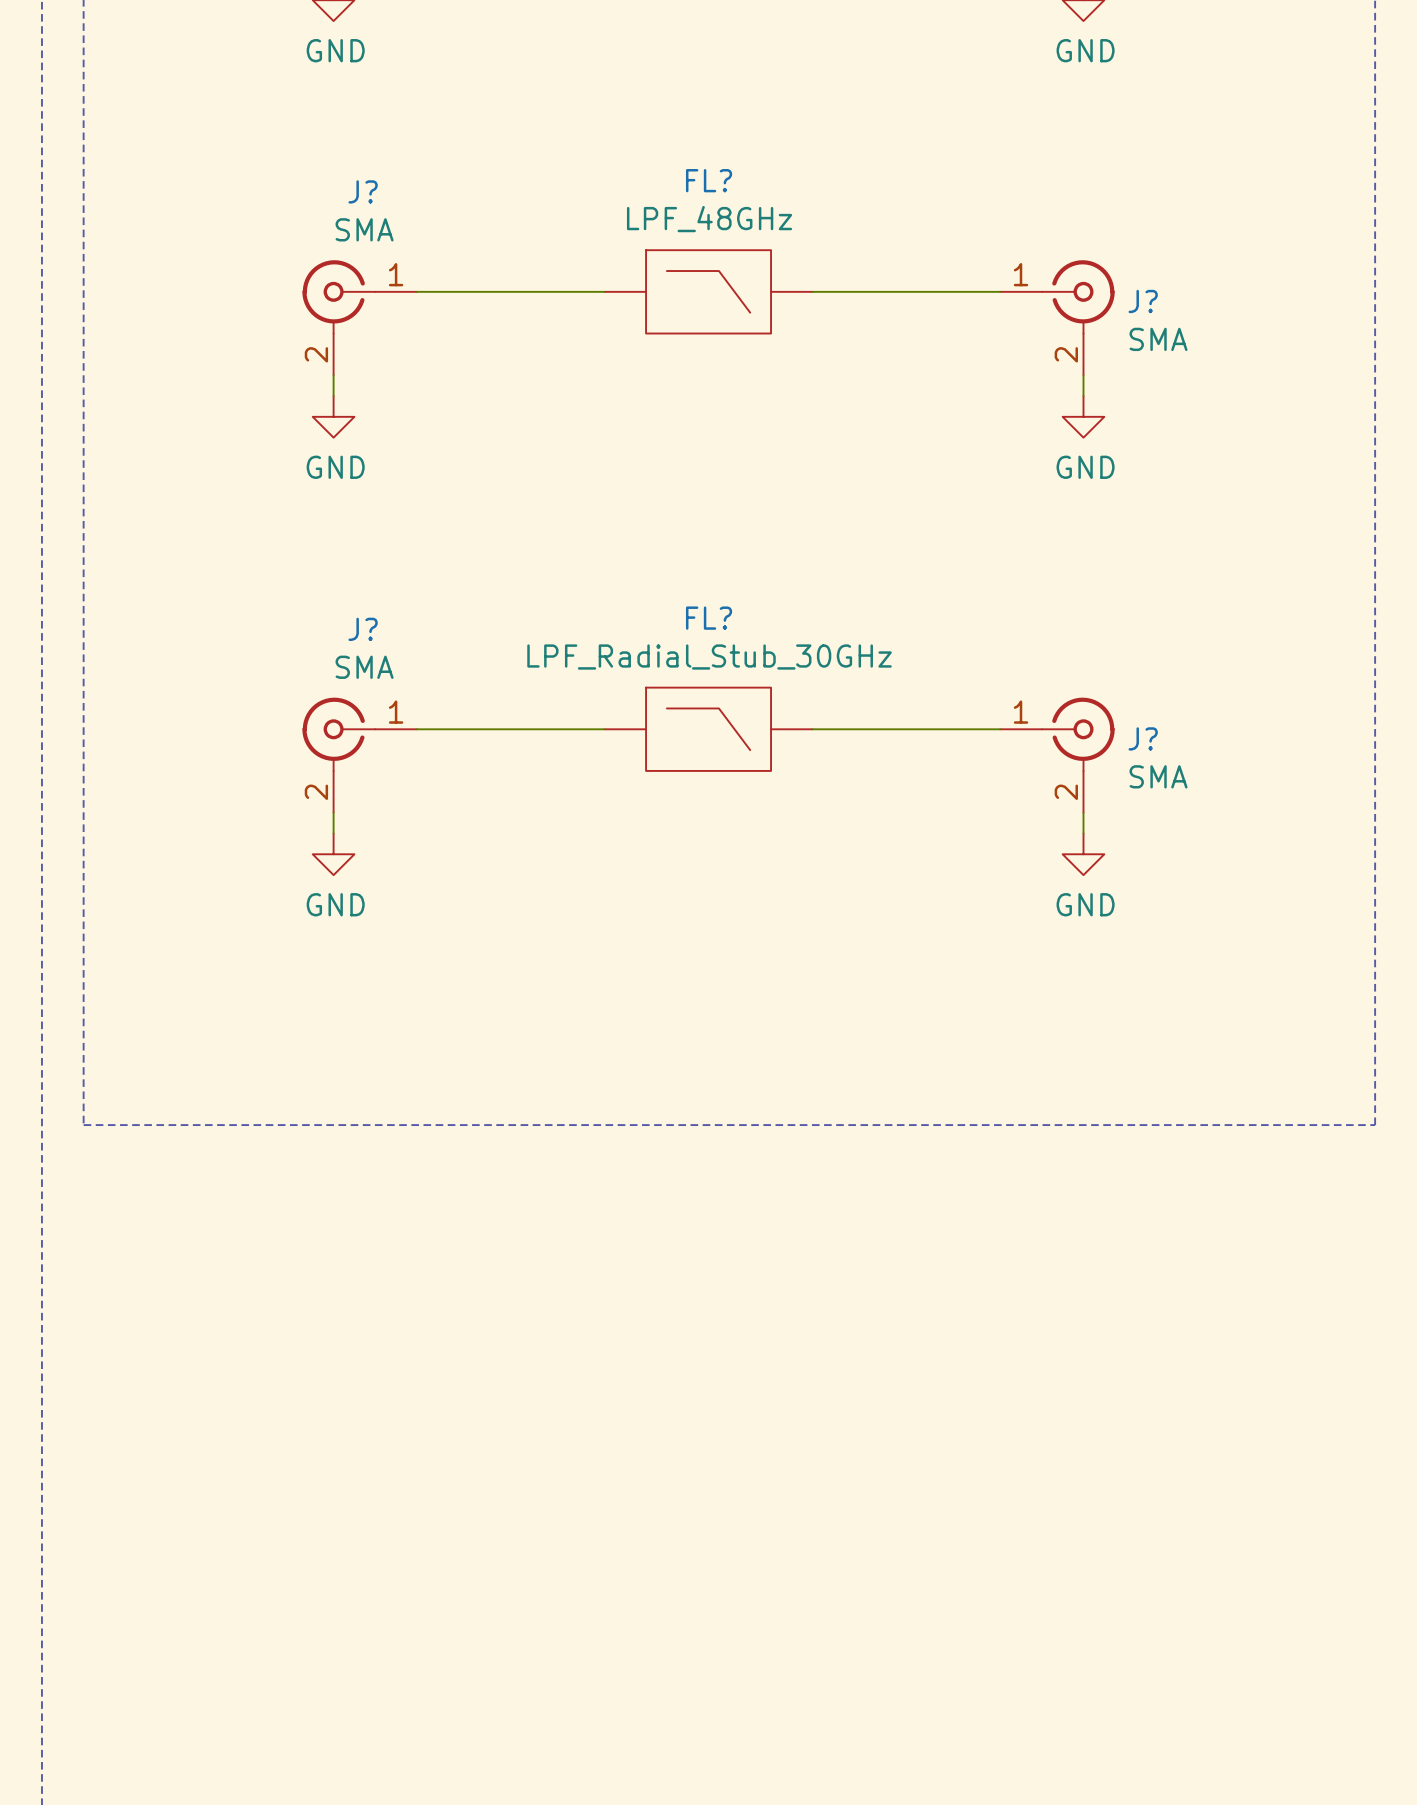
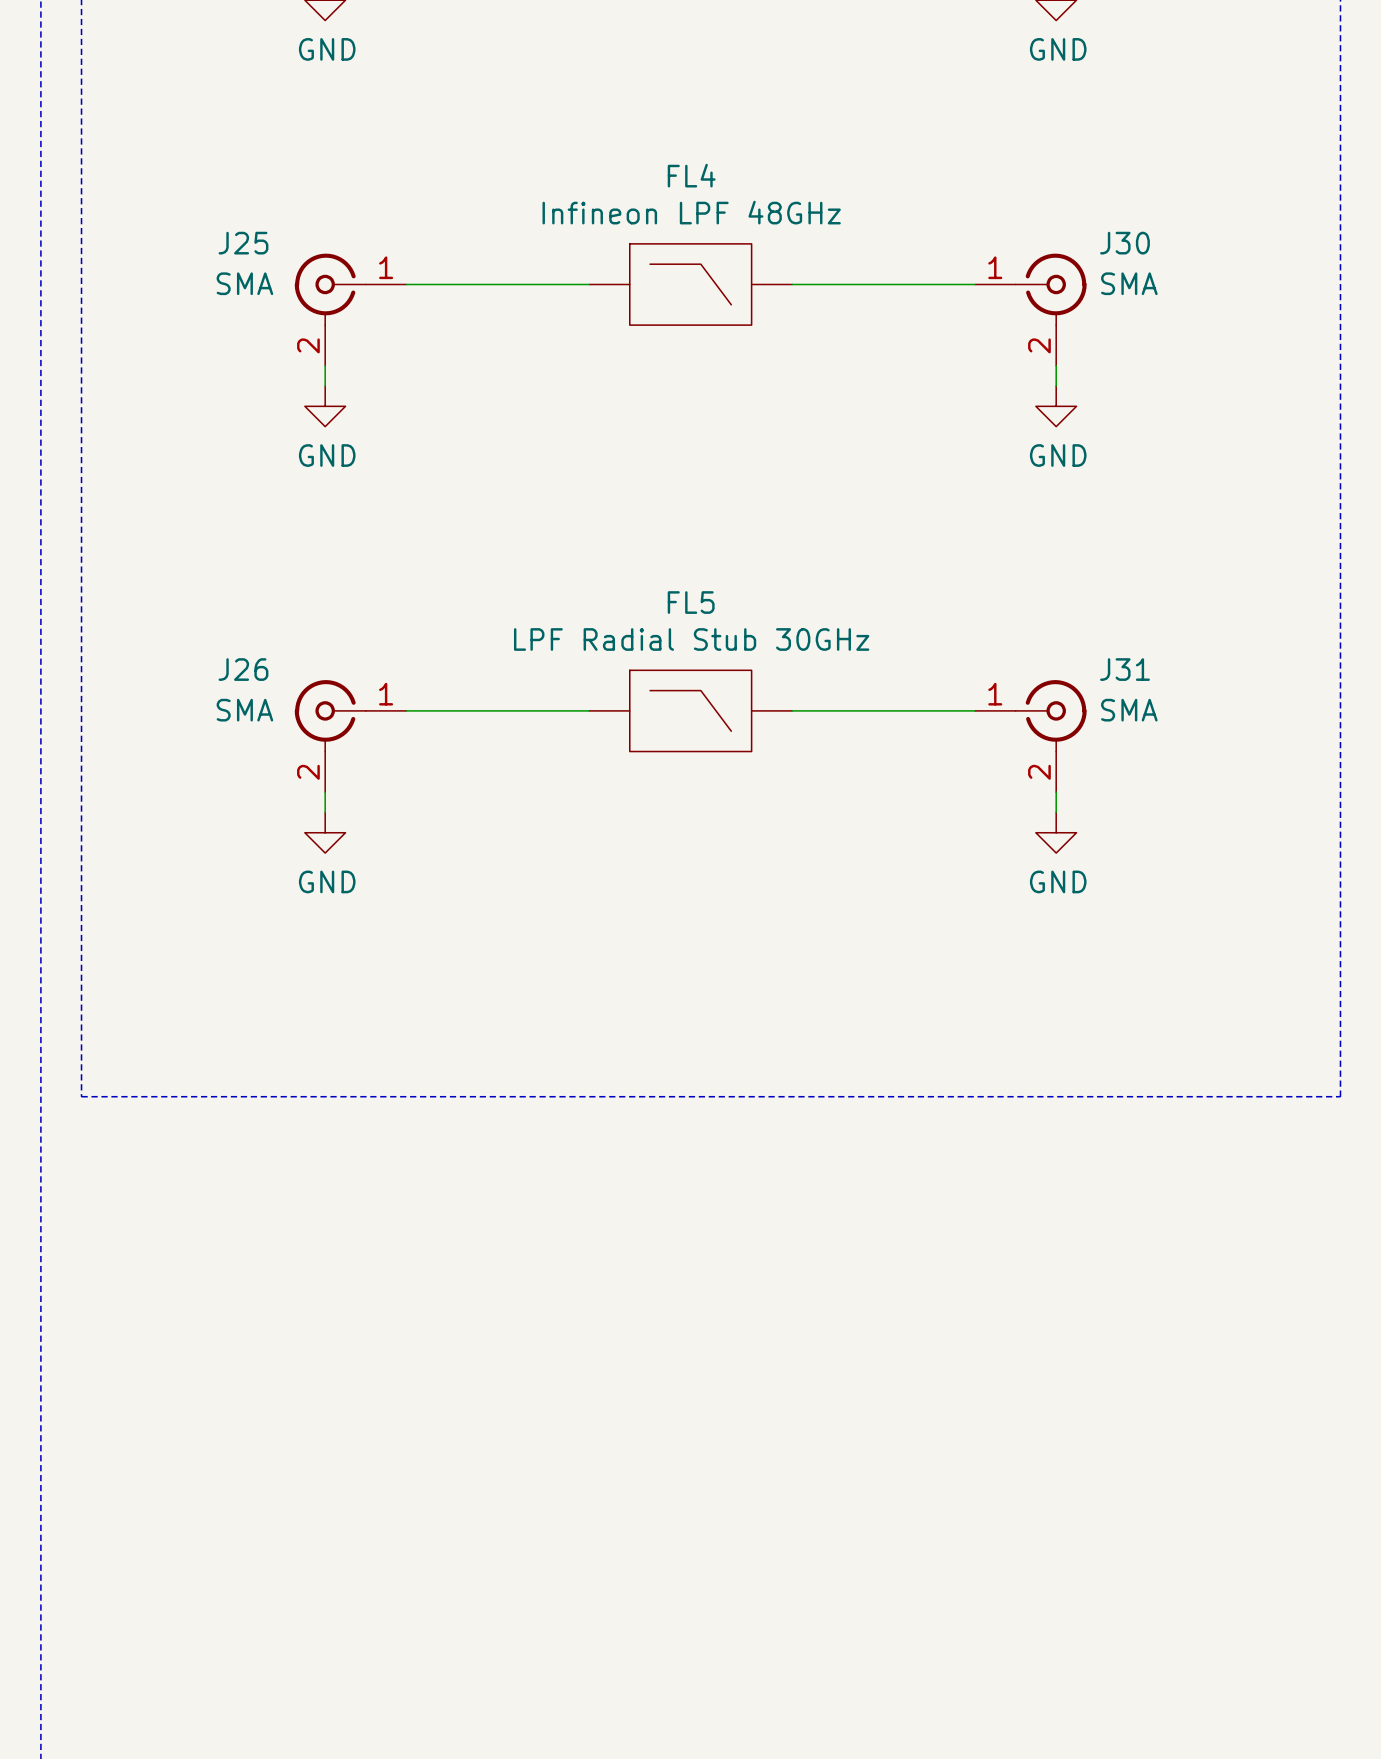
FL? name: FL? (709, 180) -> FL4 (691, 175)
J? name: J? (363, 191) -> J25 (243, 243)
FL? value: LPF_48GHz (709, 219) -> Infineon LPF 48GHz (691, 212)
J? value position: SMA (364, 229) -> SMA (244, 283)
J? name: J? (1143, 301) -> J30 (1125, 243)
J? value position: SMA (1158, 339) -> SMA (1129, 283)
FL? name: FL? (709, 618) -> FL5 (691, 602)
J? name: J? (363, 629) -> J26 (243, 669)
FL? value: LPF_Radial_Stub_30GHz (709, 657) -> LPF Radial Stub 30GHz (691, 639)
J? value position: SMA (364, 667) -> SMA (244, 710)
J? name: J? (1143, 738) -> J31 (1125, 669)
J? value position: SMA (1158, 776) -> SMA (1129, 710)

